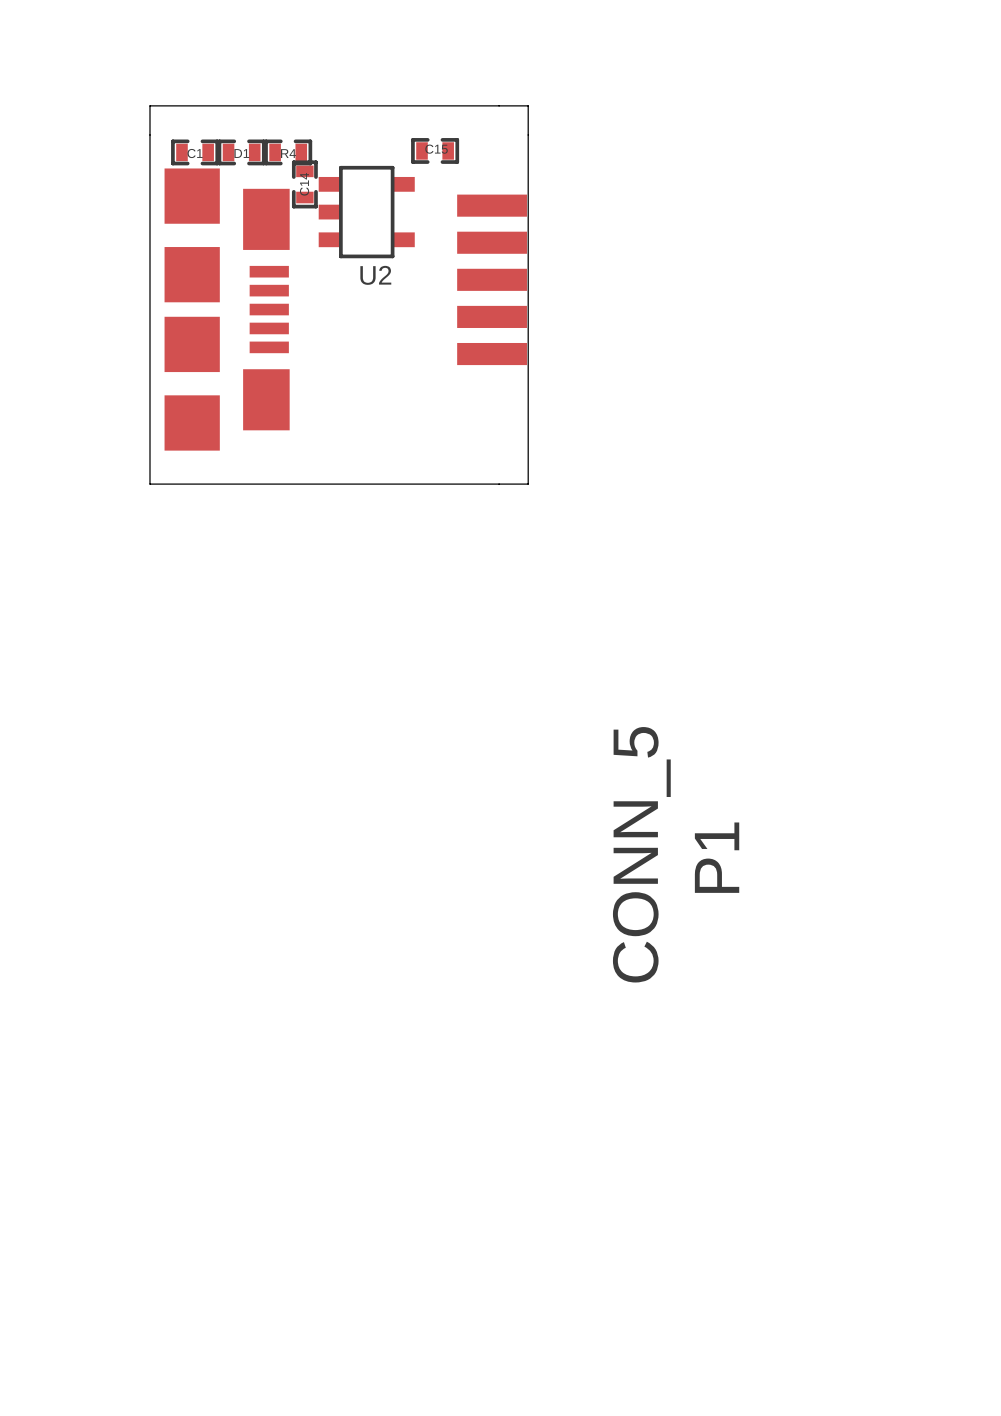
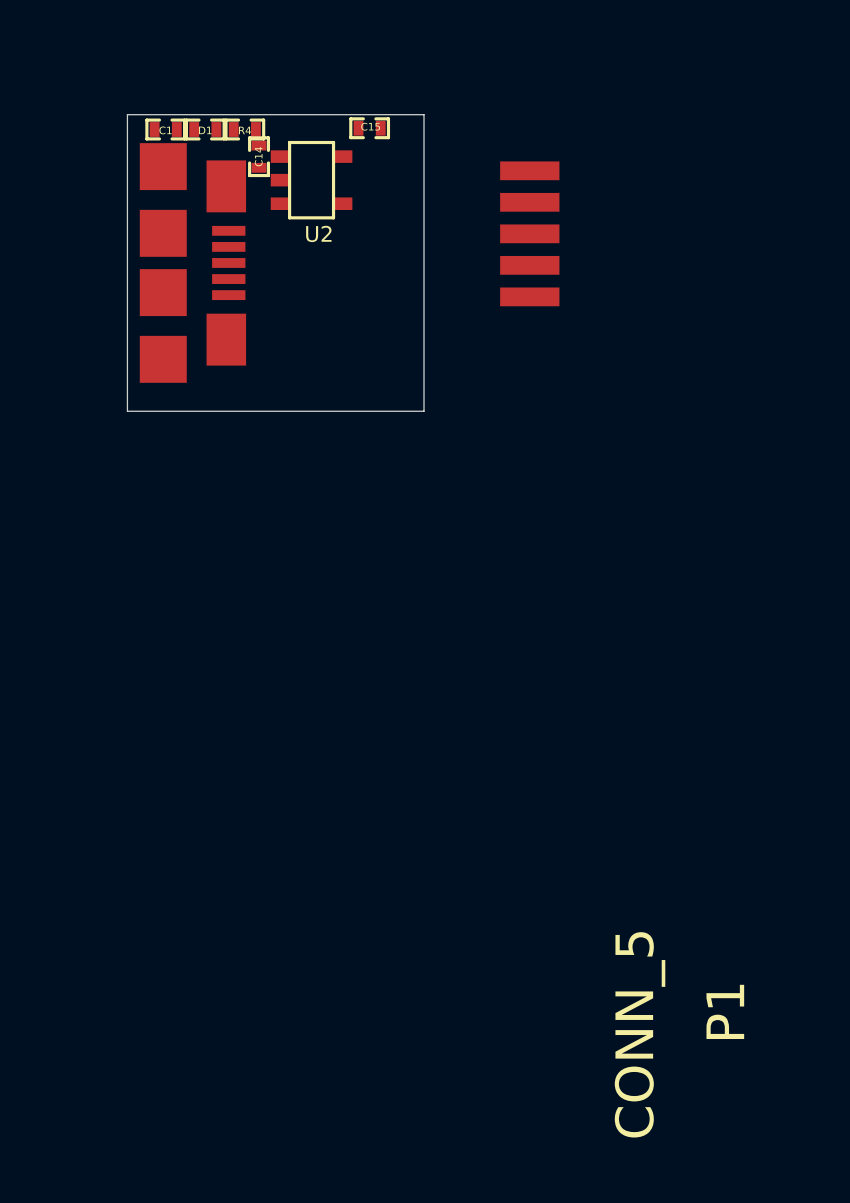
board edge: (149, 134) (149, 105) (528, 105) (528, 484) (499, 484) -> (127, 114) (424, 114) (424, 411)
P1 position: (492, 279) -> (529, 233)
P1 value position: CONN_5 (641, 854) -> CONN_5 (640, 1034)
P1 name position: P1 (717, 857) -> P1 (725, 1011)

